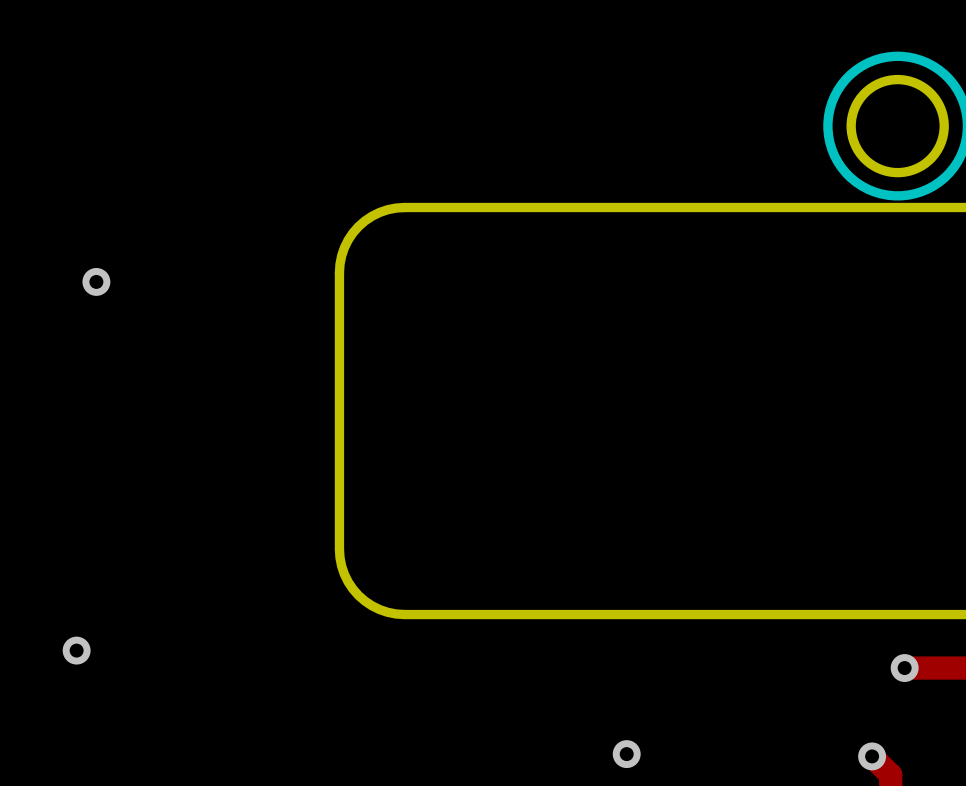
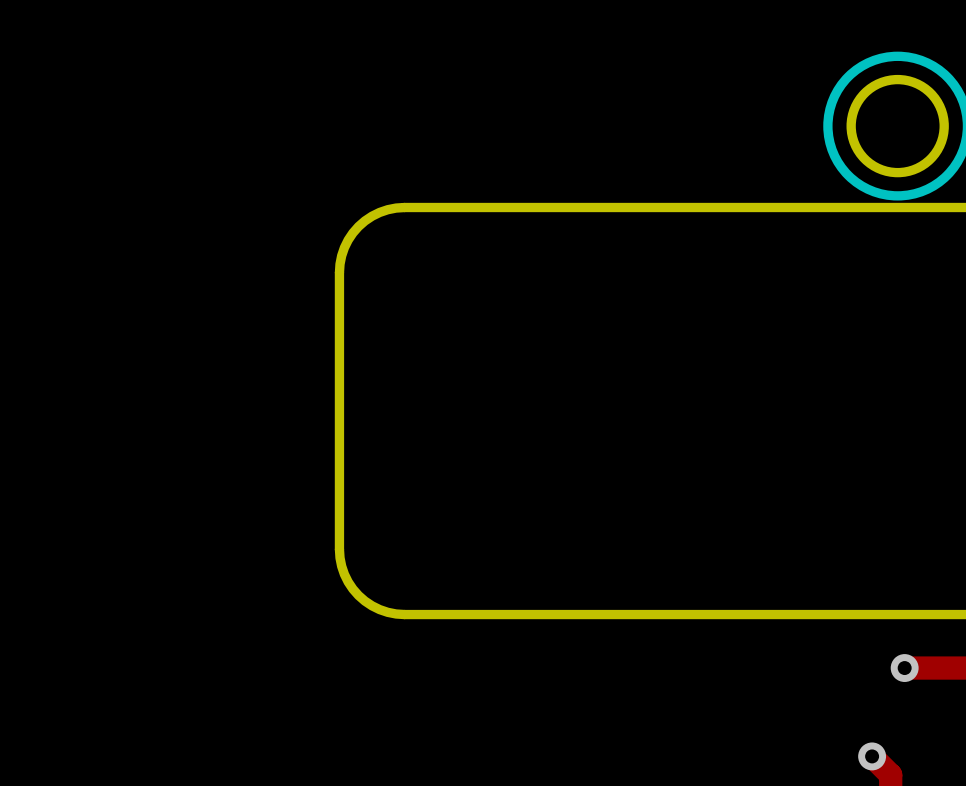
via: (96, 281) -> none
via: (76, 650) -> none
via: (626, 754) -> none

